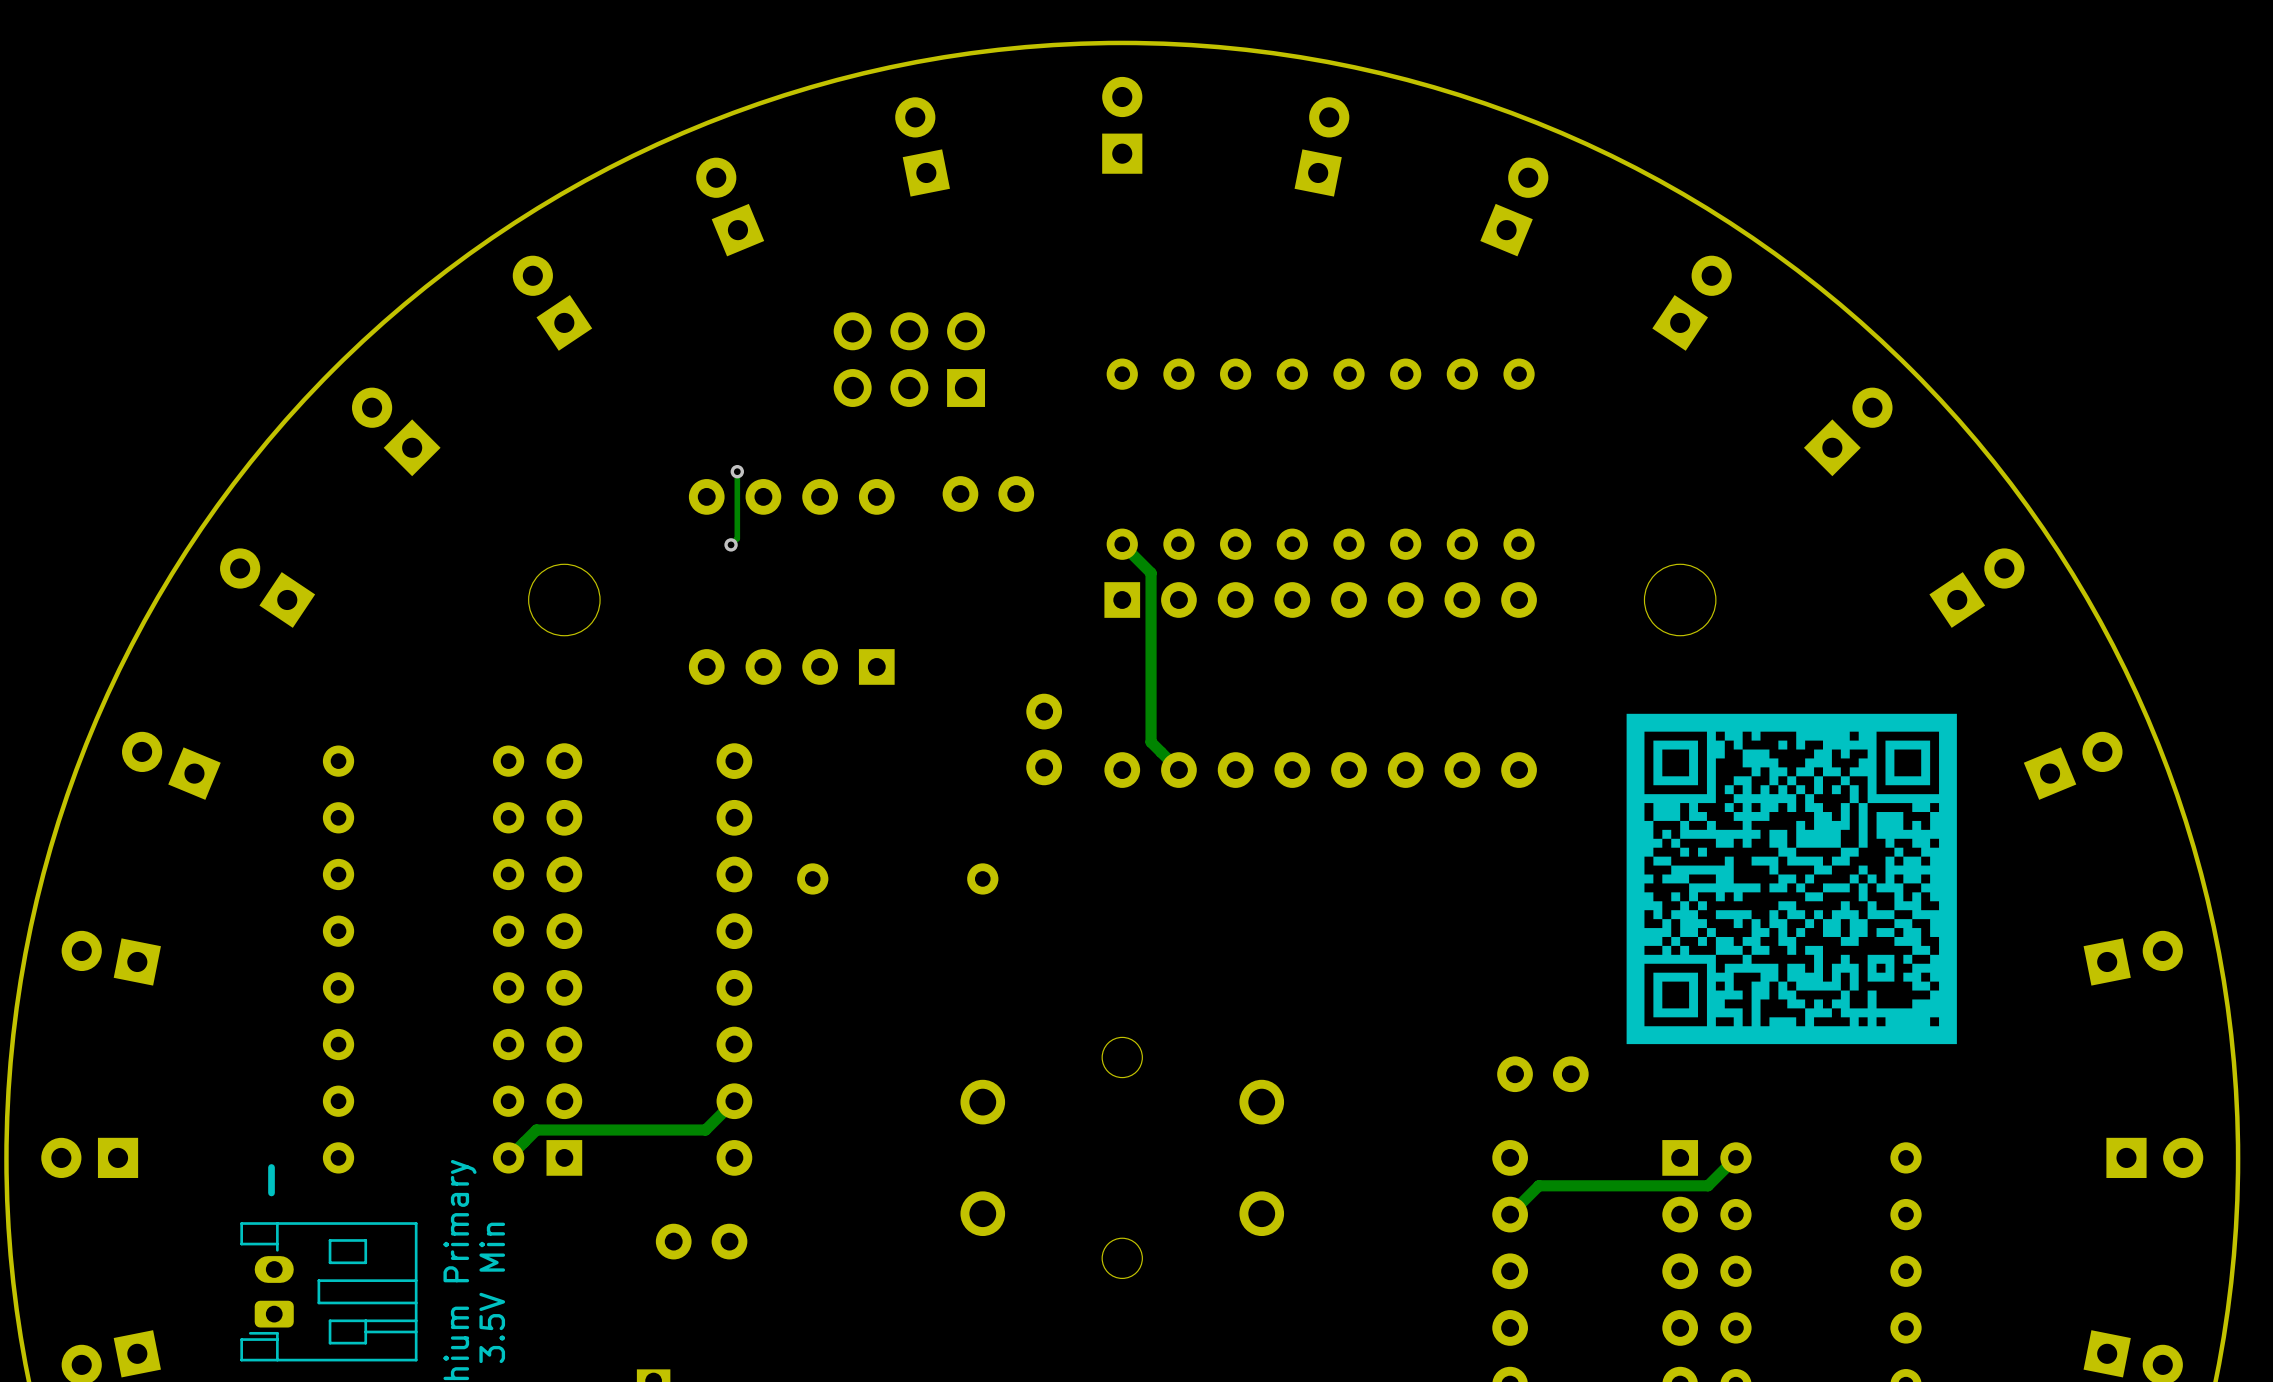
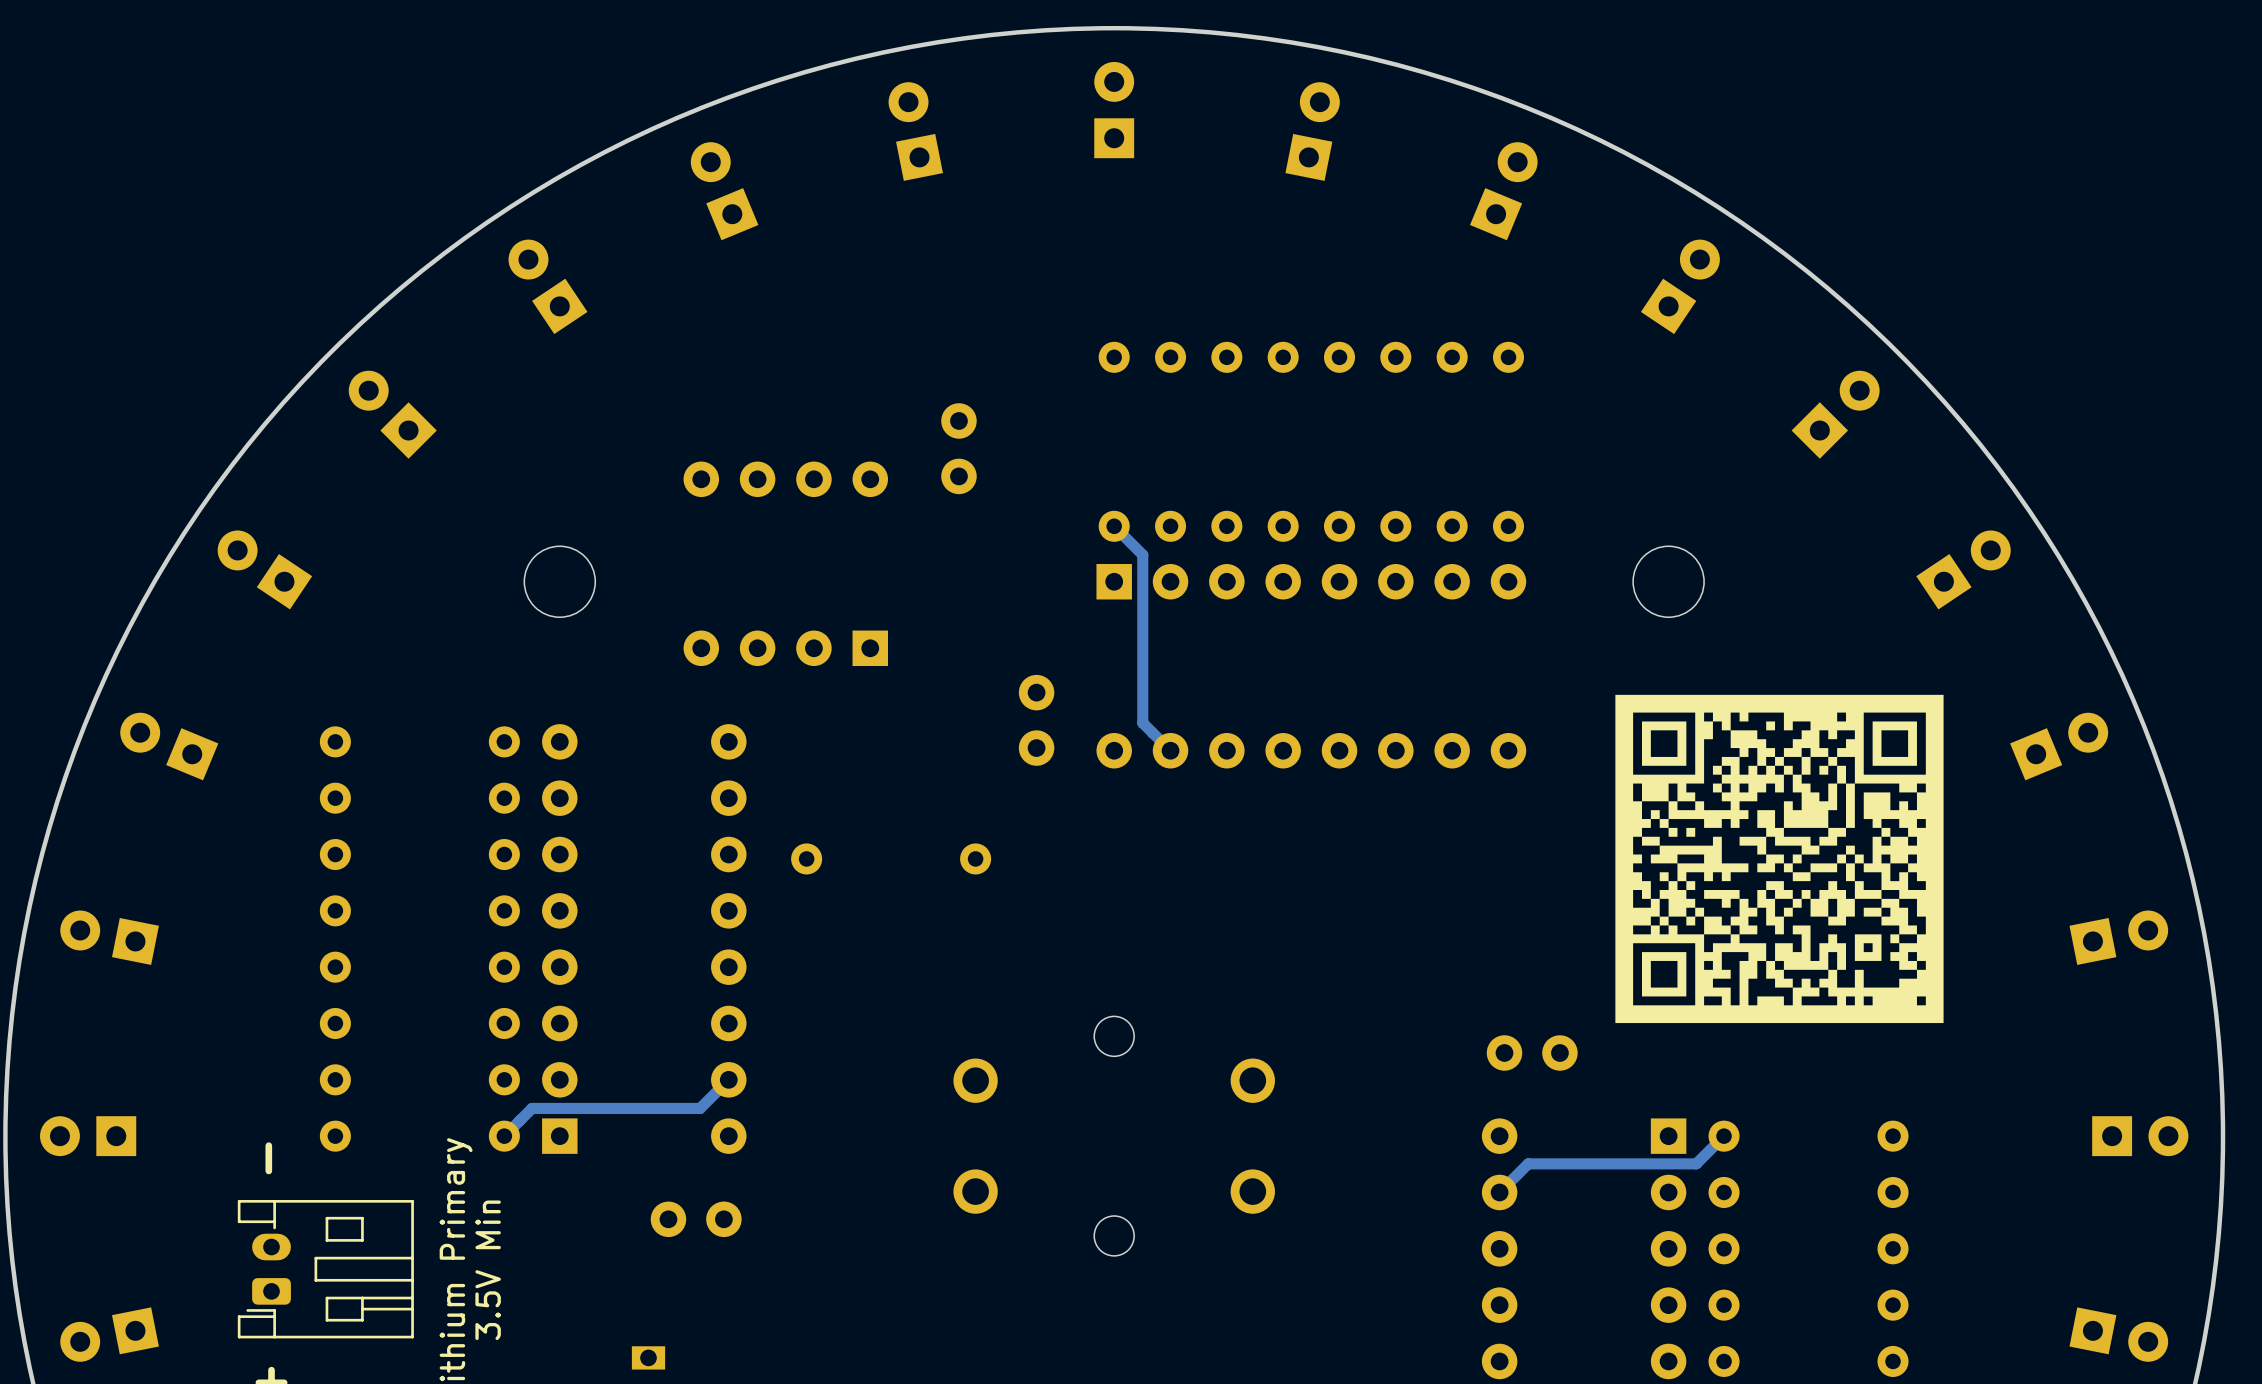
part: (909, 359) -> none
track: (737, 471) (737, 538) (731, 544) -> none
via: (737, 471) -> none
part rotation: 0° (988, 494) -> 90° clockwise (958, 448)
via: (731, 544) -> none

